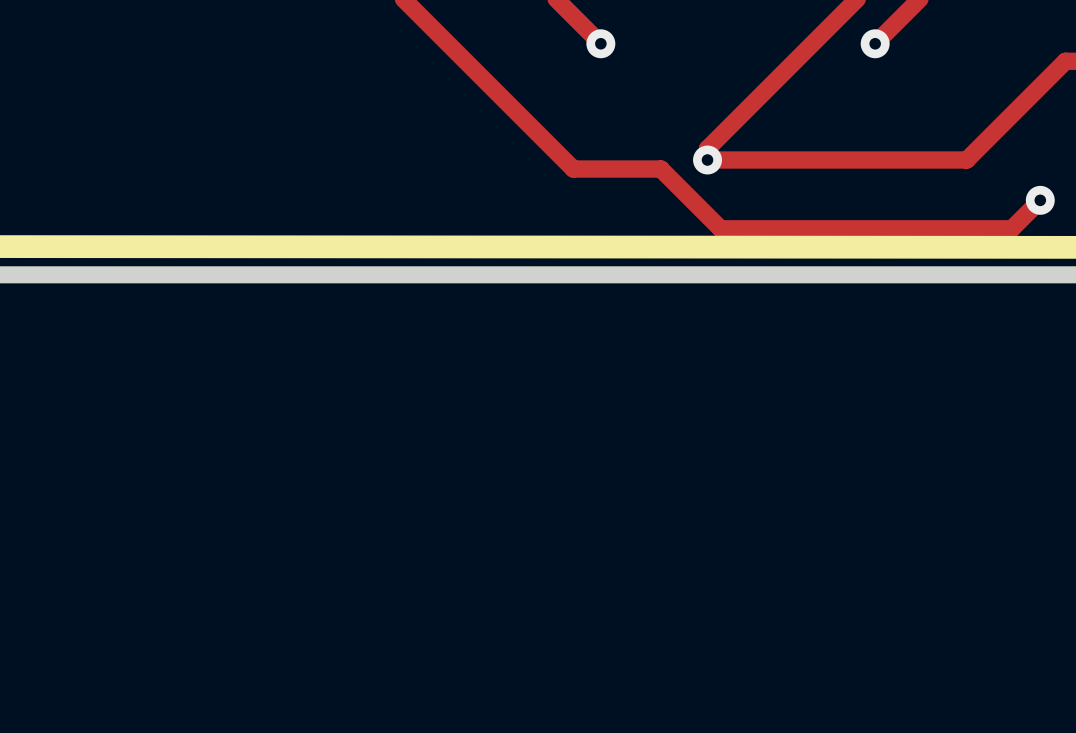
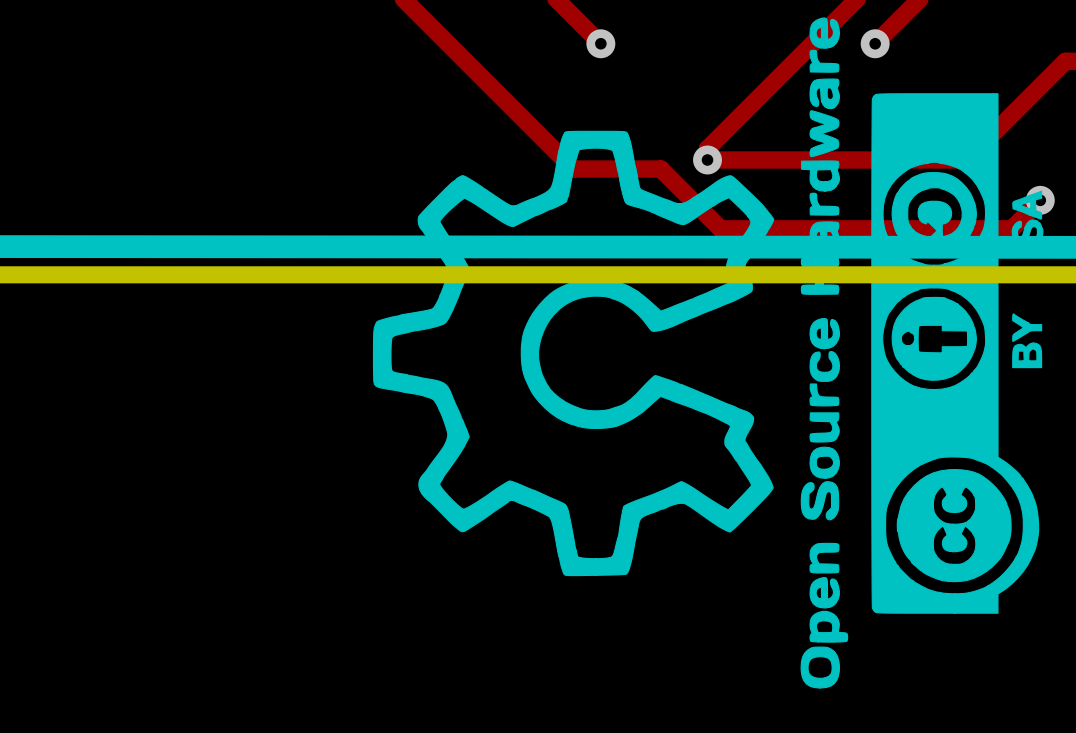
drawing: none -> [372, 17, 1044, 689]

